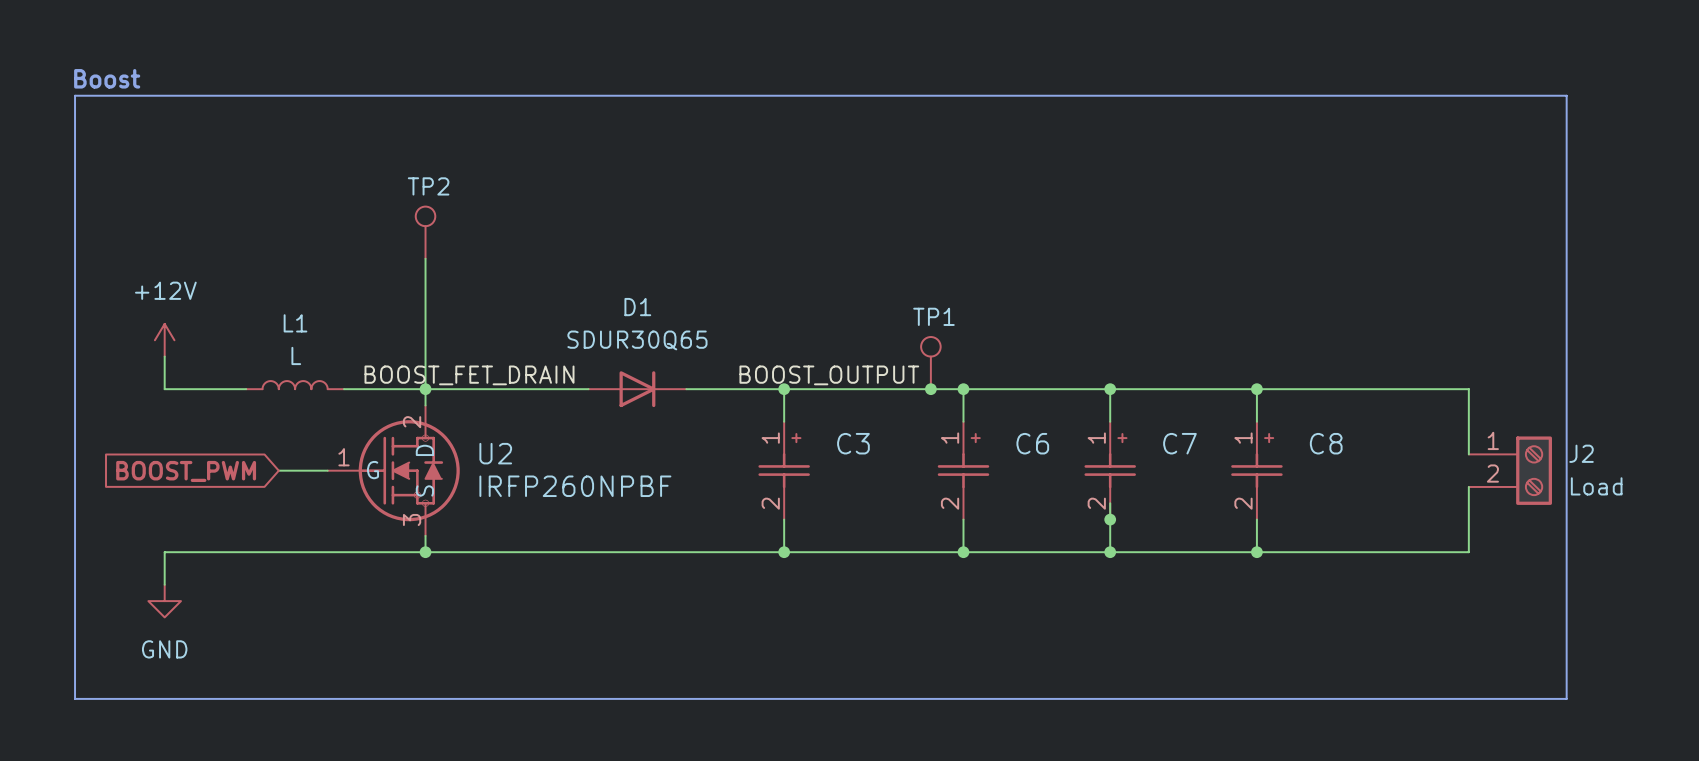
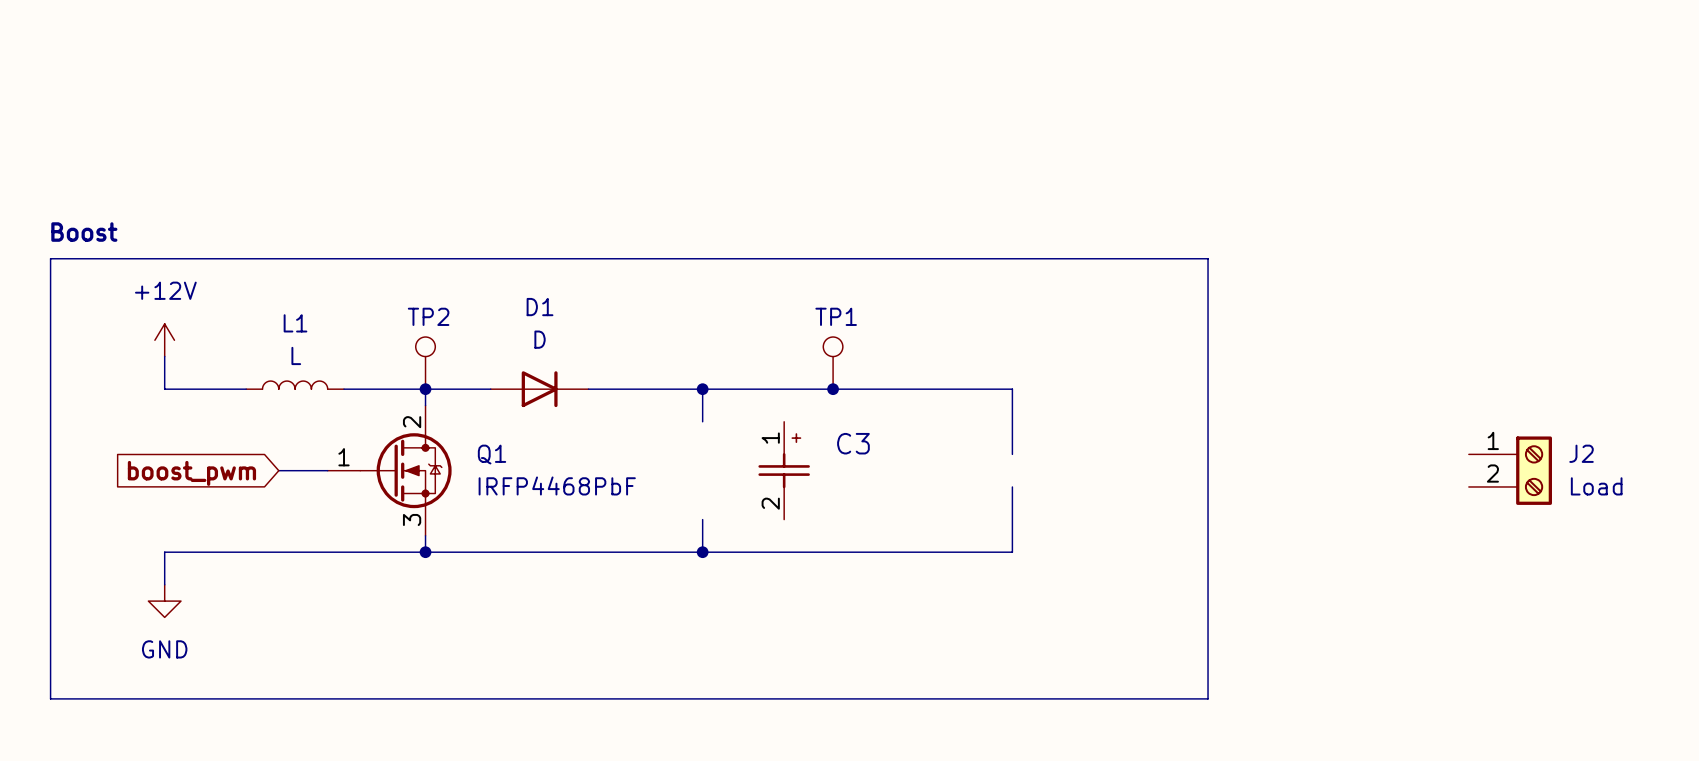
text position: Boost (107, 78) -> Boost (84, 232)
TP2 position: (425, 232) -> (425, 363)
wire: (425, 258) (425, 389) -> none
D1 value: SDUR30Q65 (637, 340) -> D (540, 339)
TP1 position: (930, 363) -> (833, 363)
label: BOOST_FET_DRAIN (469, 375) -> none
label: BOOST_OUTPUT (829, 375) -> none
D1 position: (637, 389) -> (539, 389)
junction: none -> (702, 389)
wire: (784, 389) (784, 421) -> (702, 389) (702, 421)
junction: (784, 389) -> none
junction: none -> (833, 389)
junction: (930, 389) -> none
wire: (963, 389) (963, 421) -> none
junction: (963, 389) -> none
wire: (1012, 389) (1468, 389) (1468, 454) -> (1012, 389) (1012, 454)
wire: (1110, 389) (1110, 421) -> none
junction: (1110, 389) -> none
wire: (1256, 389) (1256, 421) -> none
junction: (1256, 389) -> none
Q1: none -> IRFP4468PbF (389, 470)
U2: IRFP260NPBF (393, 470) -> none
C6: (963, 470) -> none
C7: (1110, 470) -> none
C8: (1256, 470) -> none
global label: BOOST_PWM (186, 471) -> boost_pwm (191, 473)
wire: (1468, 486) (1468, 552) (1012, 552) -> (1012, 486) (1012, 552)
wire: (1110, 503) (1110, 552) -> none
wire: (784, 519) (784, 552) -> (702, 519) (702, 552)
wire: (963, 519) (963, 552) -> none
junction: (1110, 519) -> none
wire: (1256, 519) (1256, 552) -> none
junction: none -> (702, 552)
junction: (784, 552) -> none
junction: (963, 552) -> none
junction: (1110, 552) -> none
junction: (1256, 552) -> none
line: (75, 698) (75, 95) (1566, 95) (1566, 698) (1208, 698) -> (75, 698) (50, 698) (50, 258) (1208, 258) (1208, 698)

